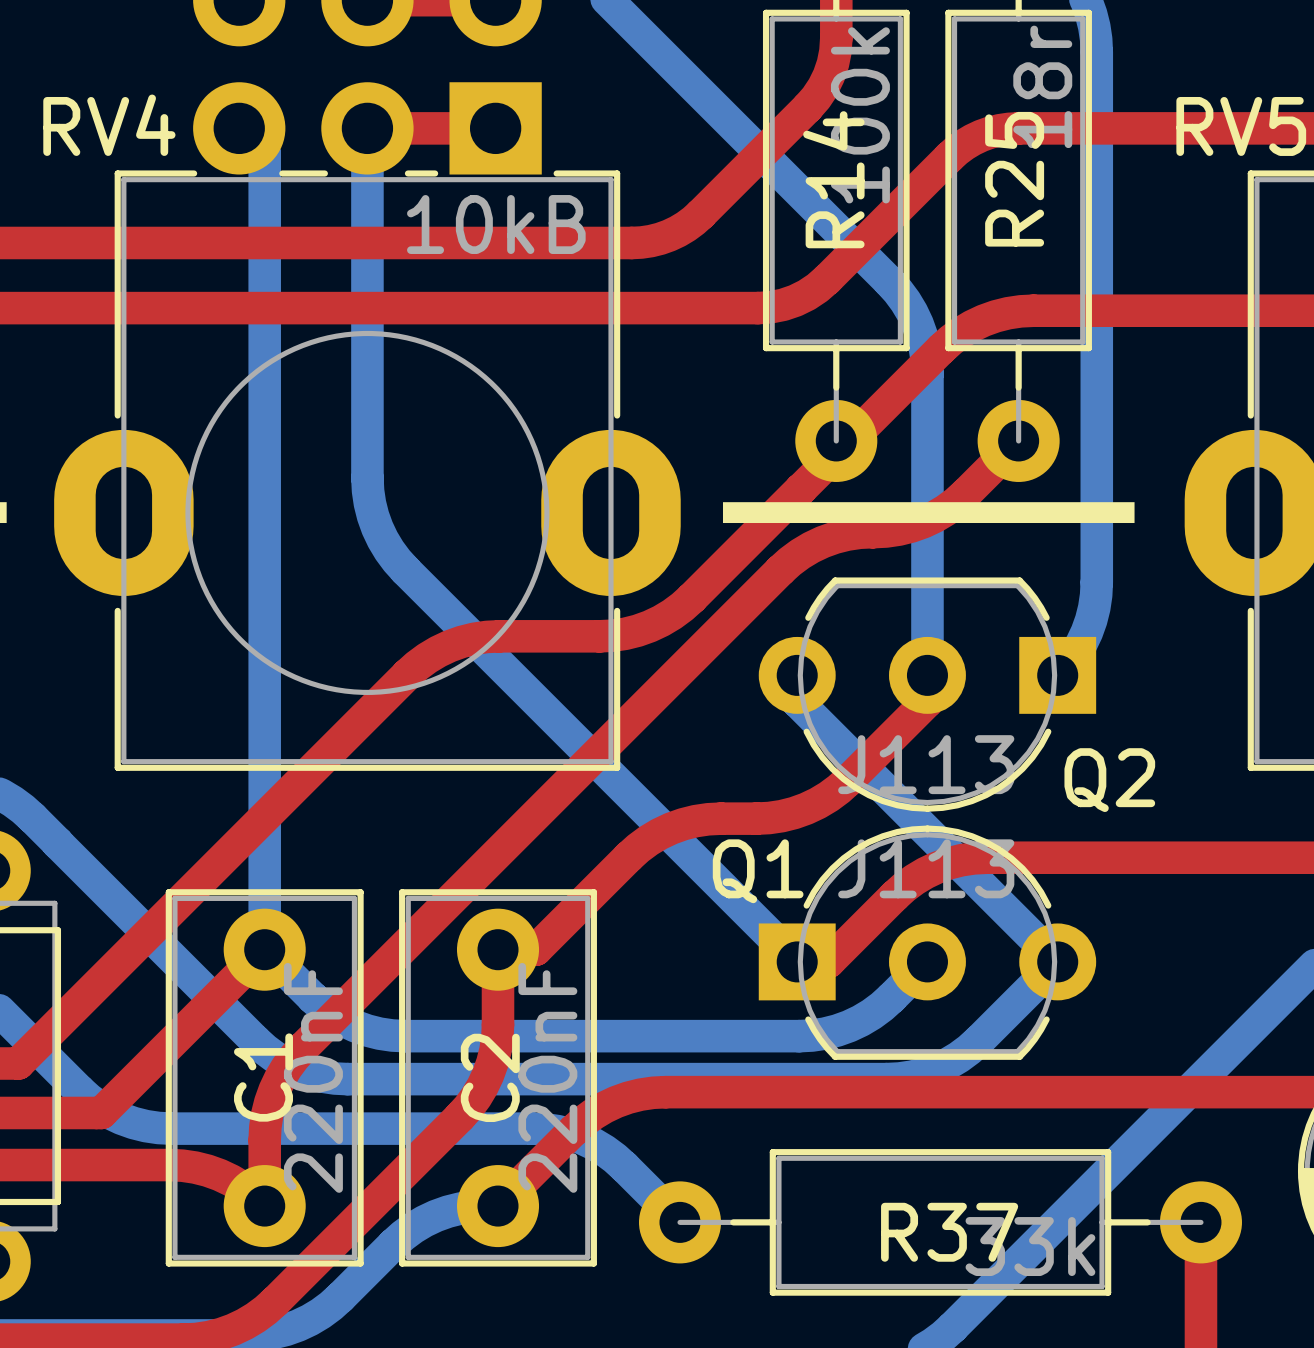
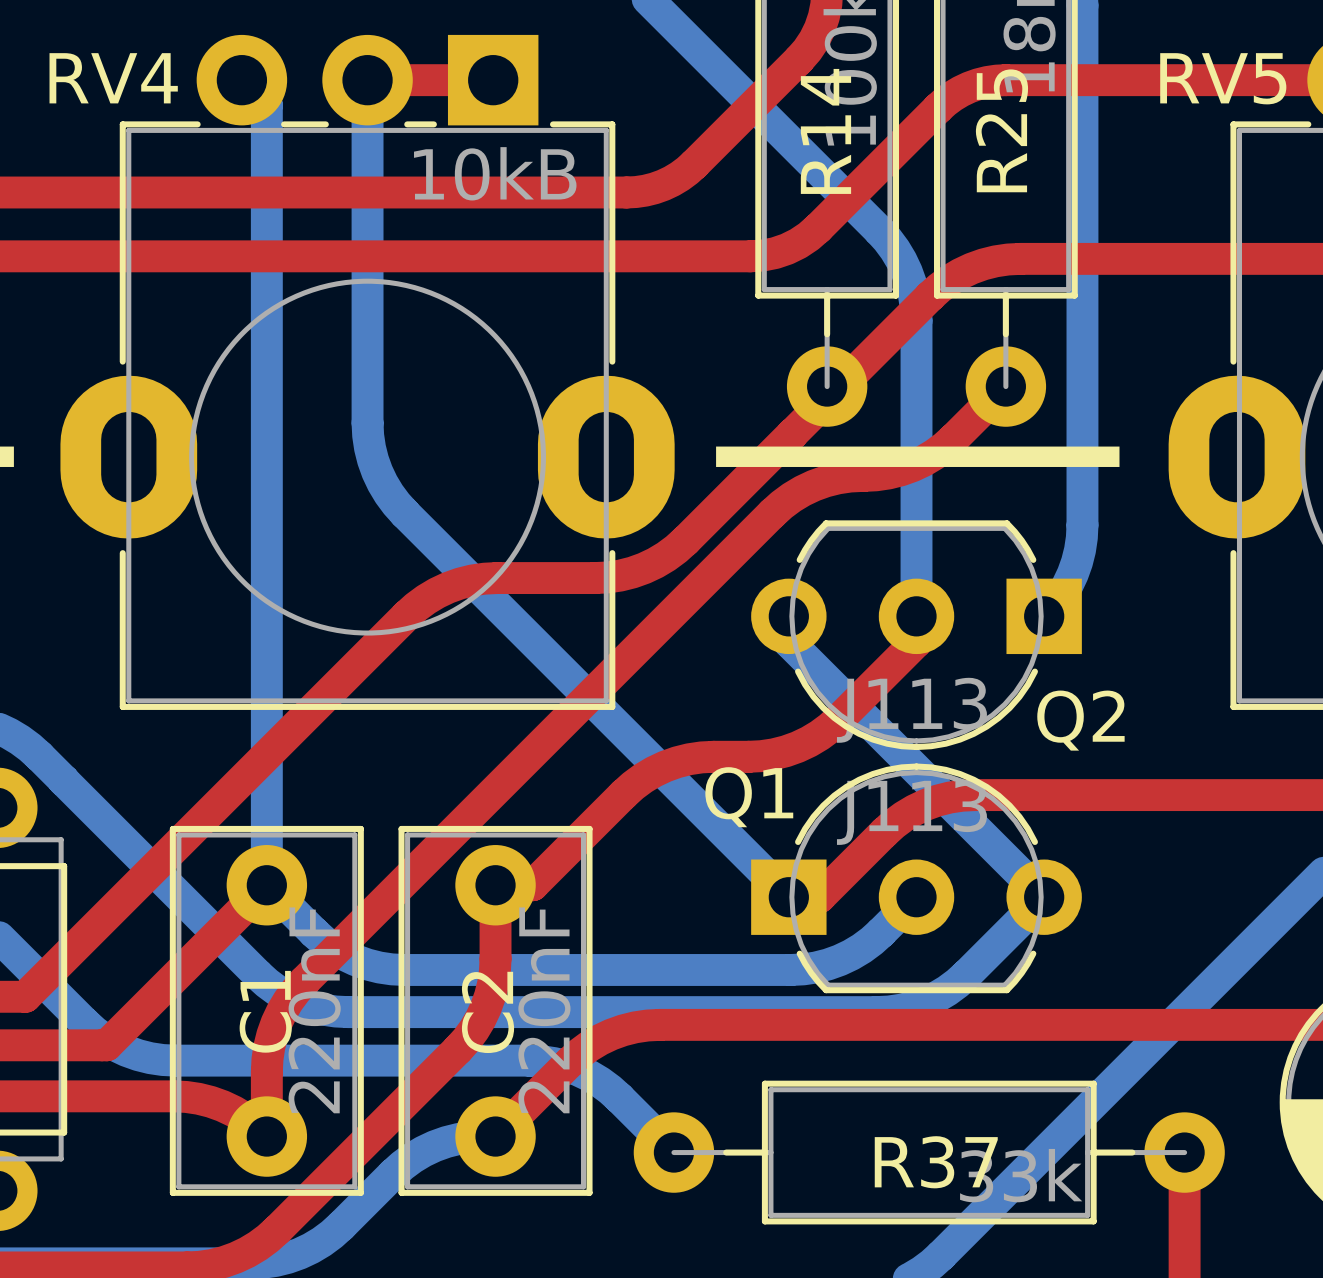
Q2 name position: Q2 (1109, 780) -> Q2 (1080, 720)
Q1 name position: Q1 (758, 871) -> Q1 (749, 797)

